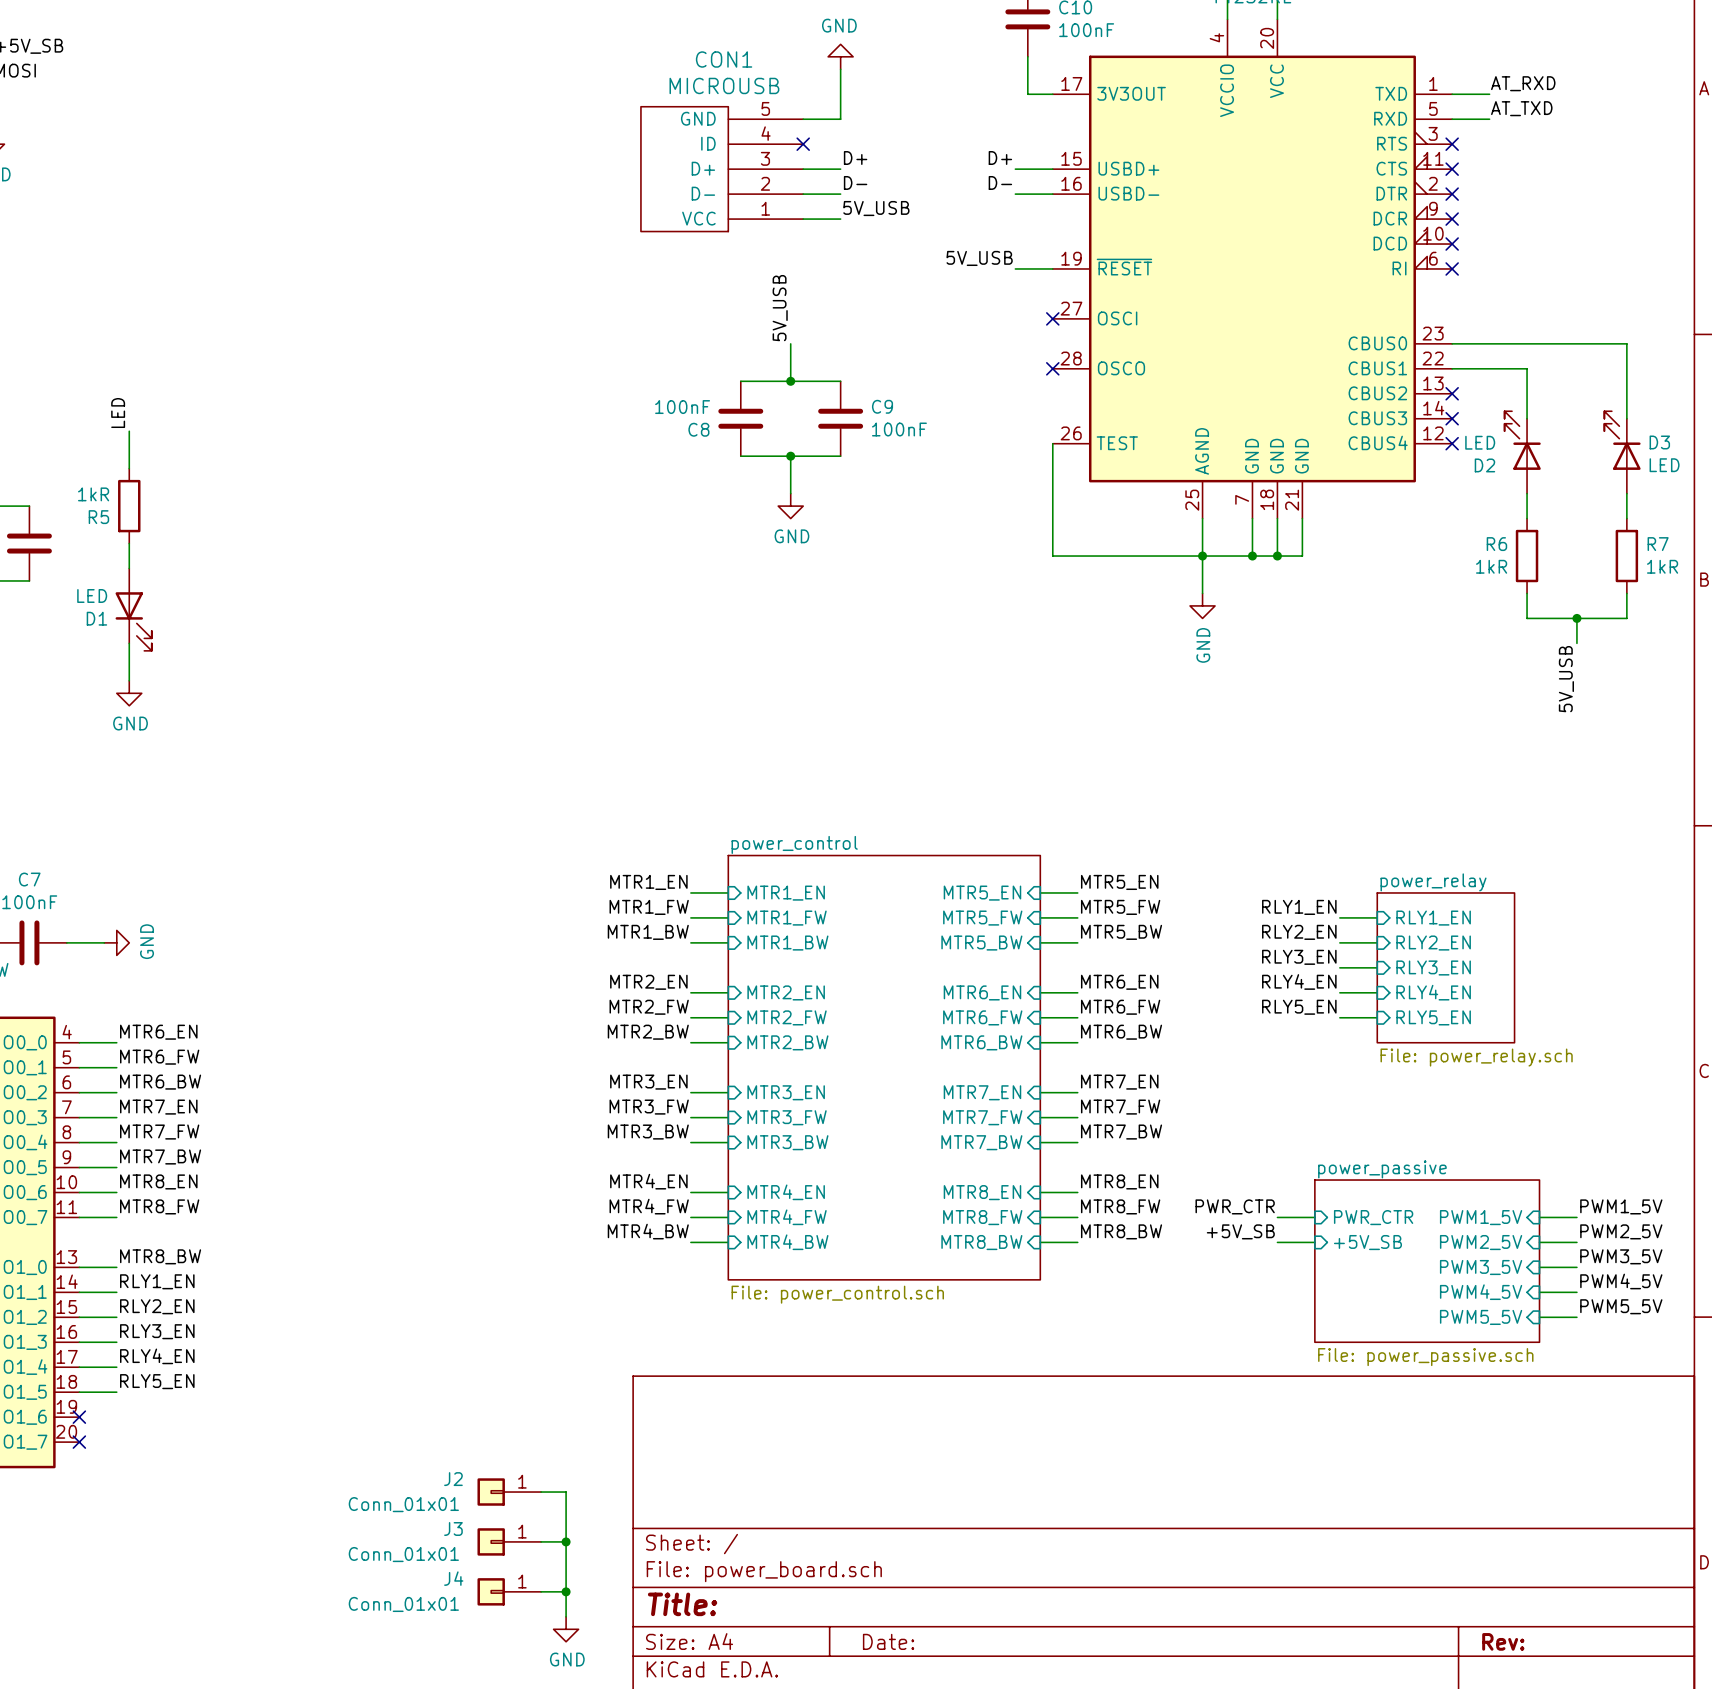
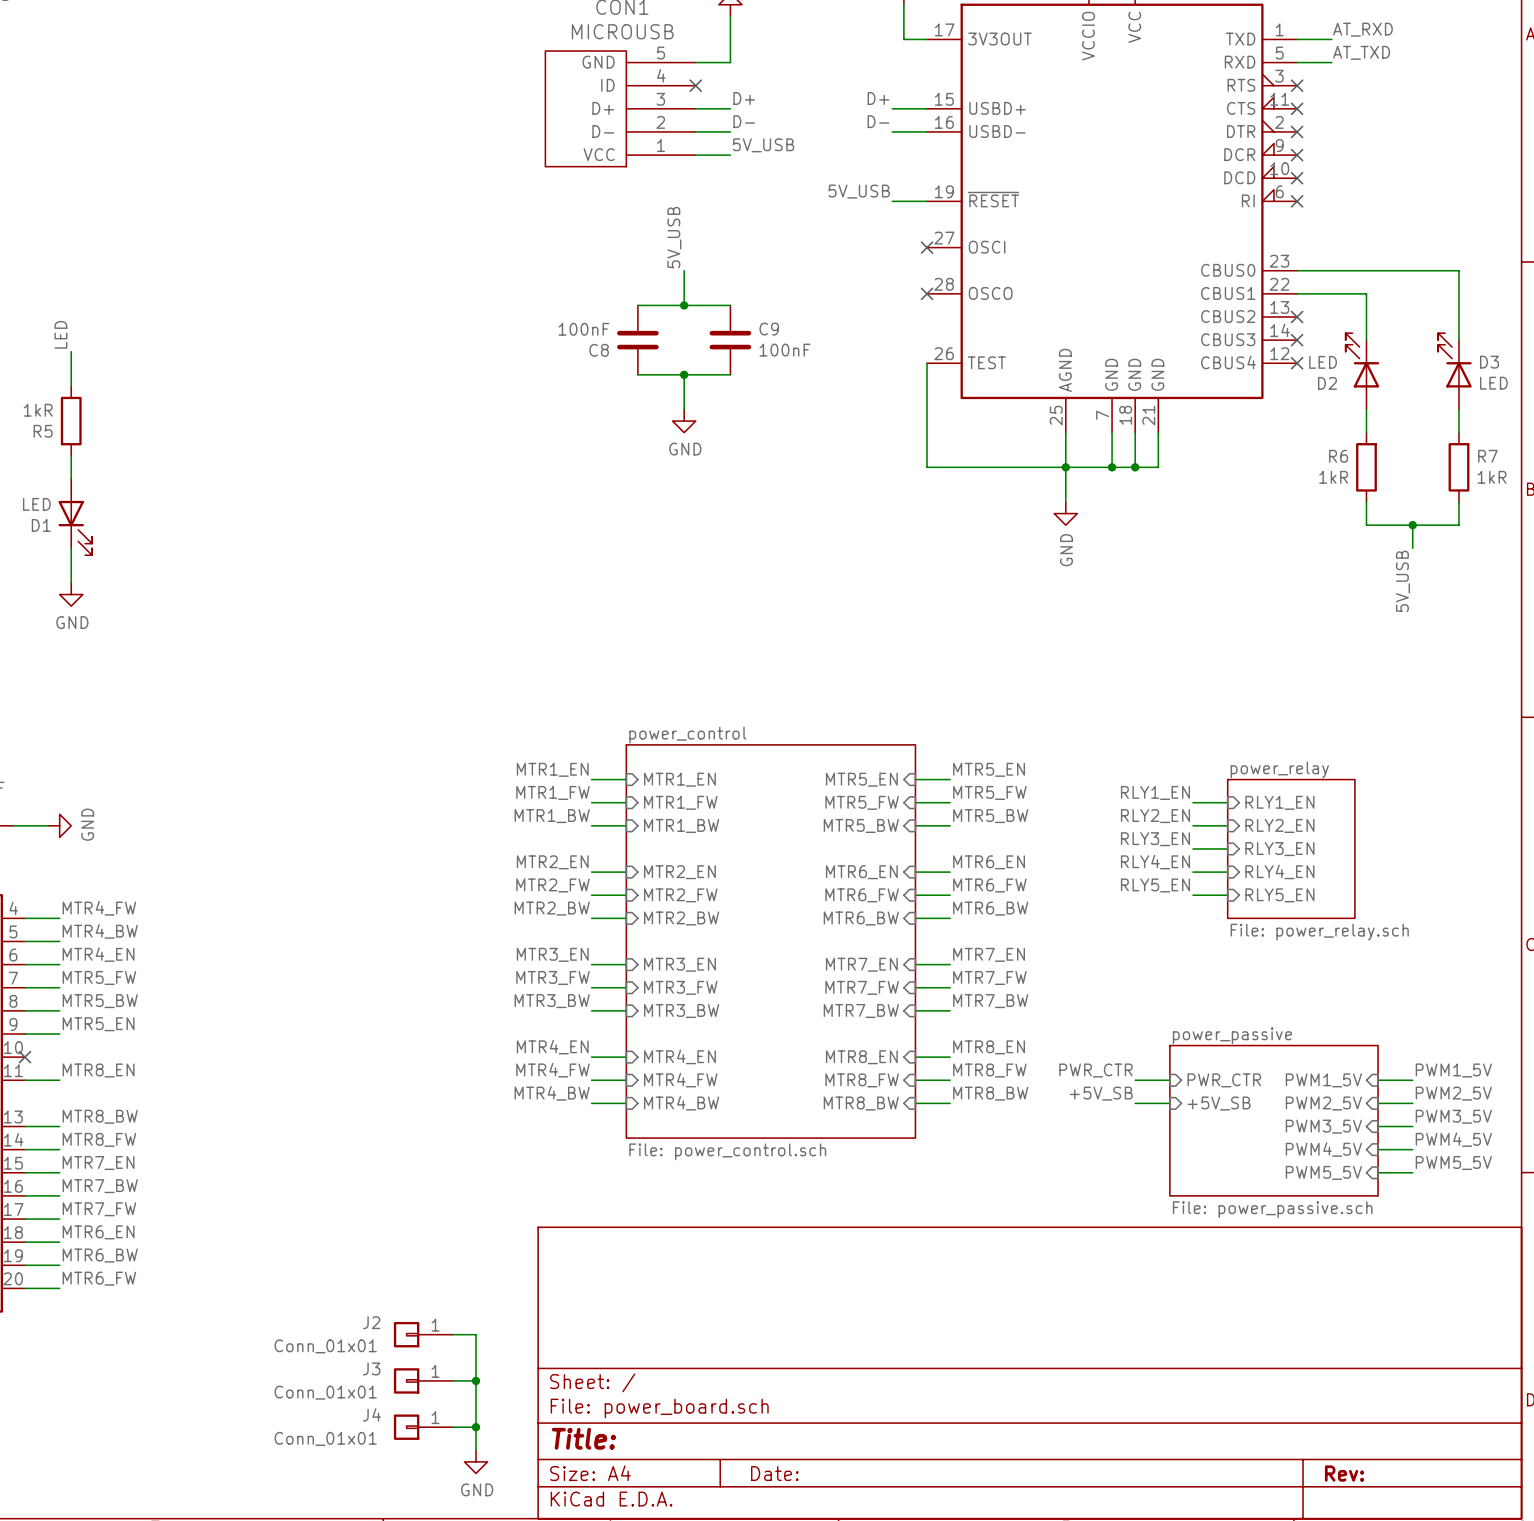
label: MTR6_EN (158, 1032) -> MTR4_FW (99, 908)
label: MTR6_FW (159, 1057) -> MTR4_BW (100, 931)
label: MTR6_BW (160, 1082) -> MTR4_EN (98, 954)
label: MTR7_EN (158, 1107) -> MTR5_FW (99, 977)
label: MTR7_FW (159, 1132) -> MTR5_BW (100, 1001)
label: MTR7_BW (160, 1157) -> MTR5_EN (98, 1024)
label: MTR8_EN (158, 1181) -> none
wire: (79, 1192) (116, 1192) -> (24, 1265) (59, 1265)
no-connect mark: none -> (24, 1057)
label: MTR8_FW (159, 1206) -> MTR8_EN (98, 1070)
label: RLY1_EN (157, 1281) -> MTR8_FW (99, 1139)
label: RLY2_EN (157, 1306) -> MTR7_EN (98, 1163)
label: RLY3_EN (157, 1331) -> MTR7_BW (100, 1186)
label: RLY4_EN (157, 1356) -> MTR7_FW (99, 1209)
label: RLY5_EN (157, 1381) -> MTR6_EN (98, 1232)
label: none -> MTR6_BW (100, 1255)
no-connect mark: (79, 1417) -> none
label: none -> MTR6_FW (99, 1278)
wire: none -> (24, 1288) (59, 1288)
no-connect mark: (79, 1442) -> none

